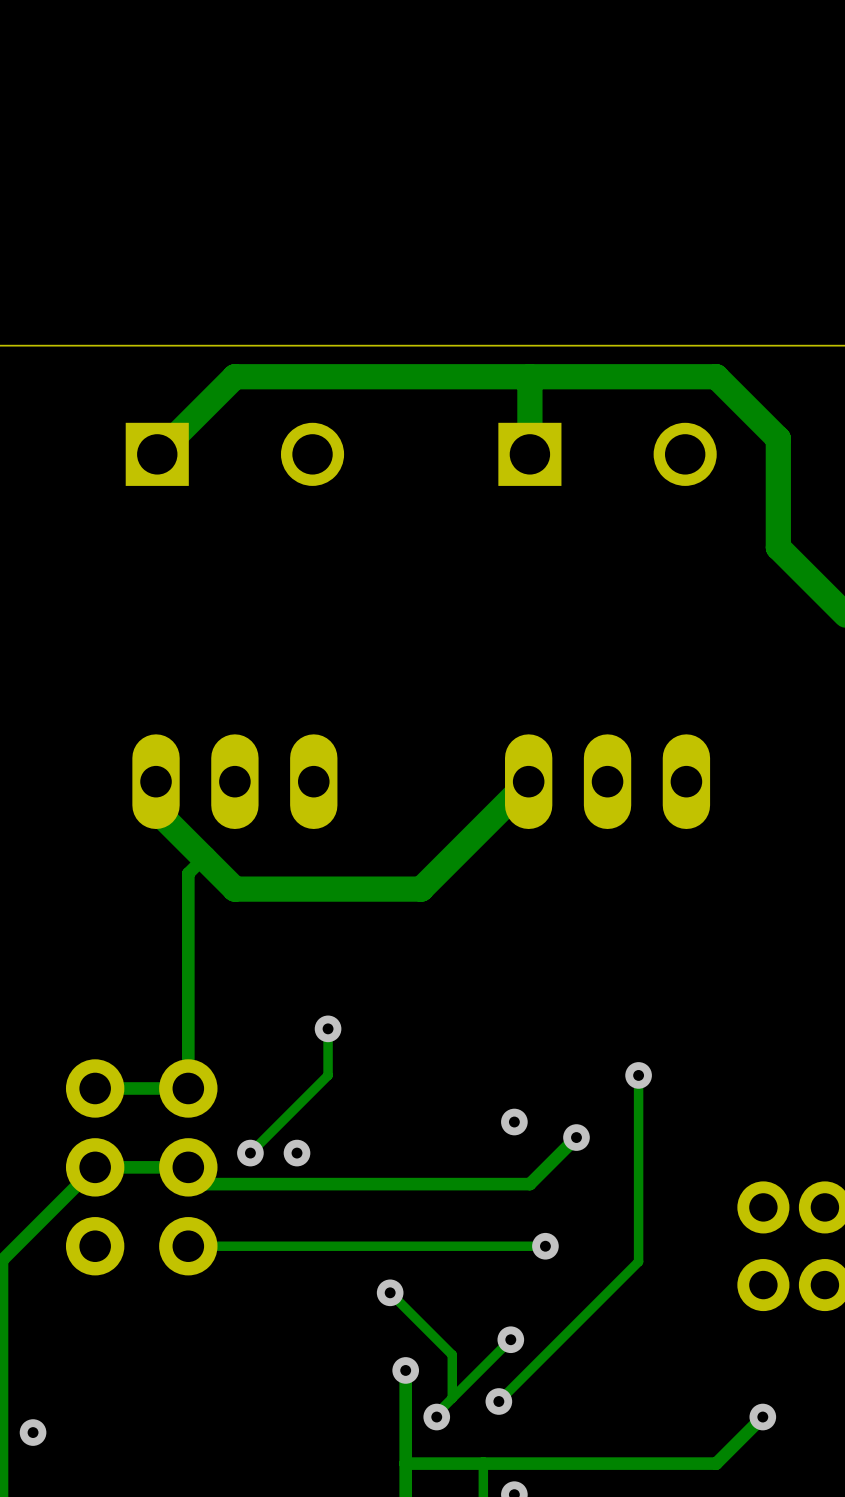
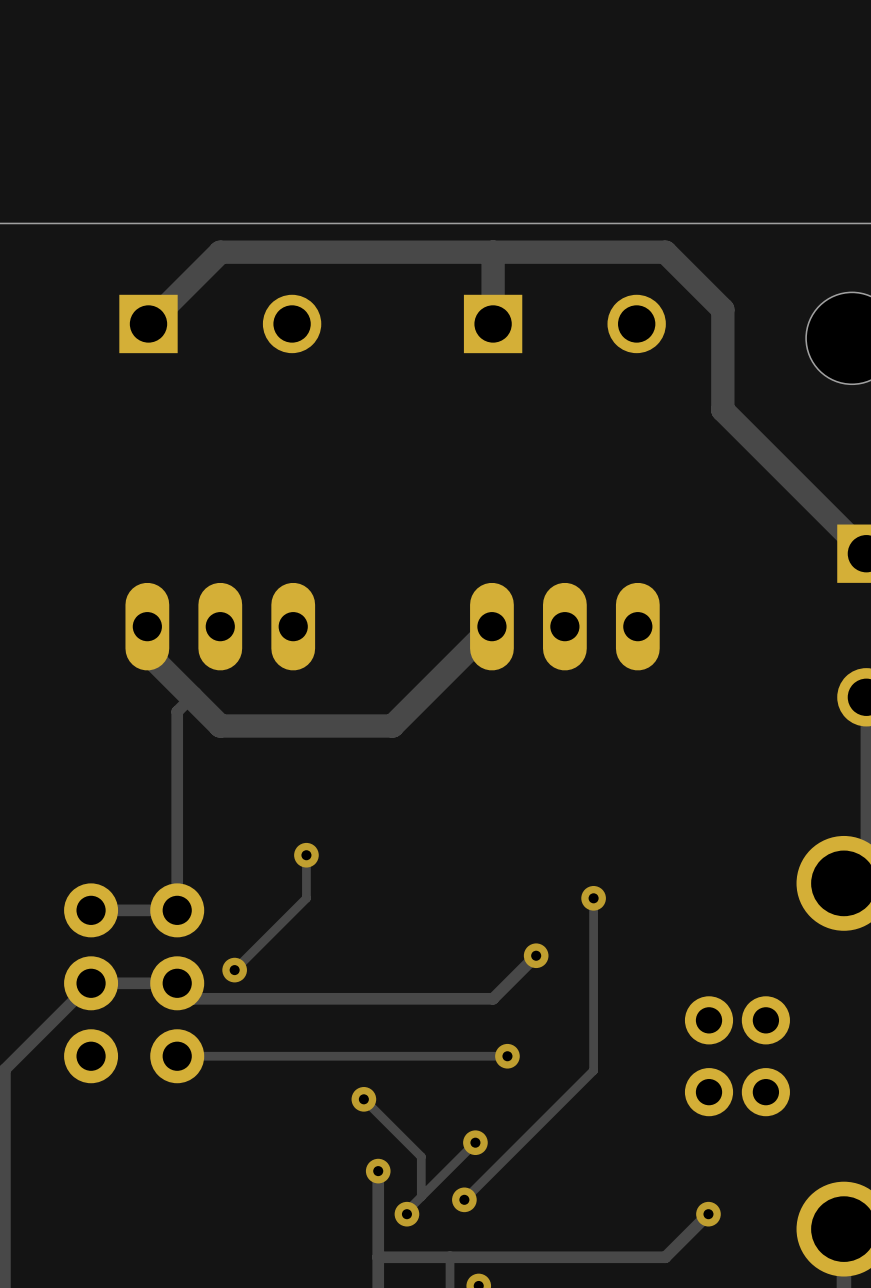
via: (514, 1122) -> none
via: (297, 1153) -> none
via: (33, 1432) -> none

